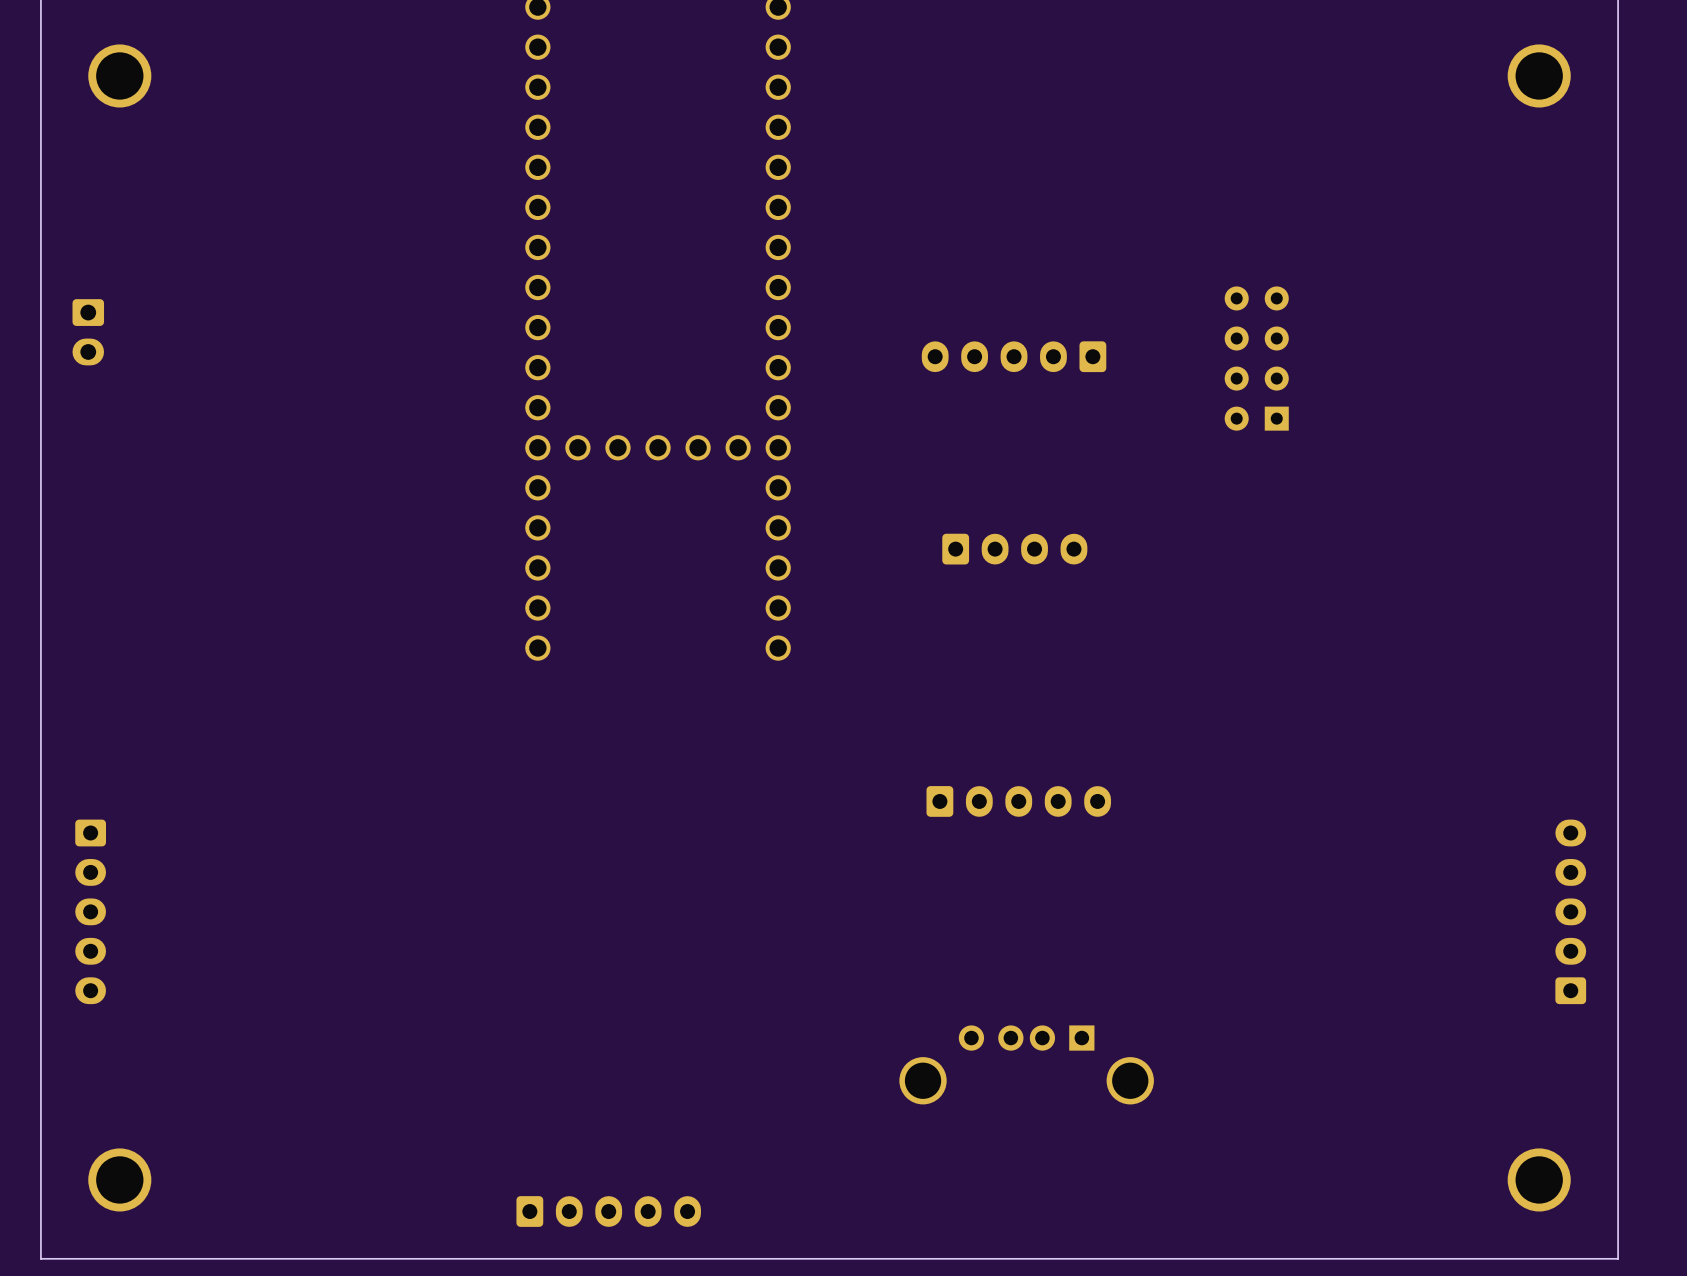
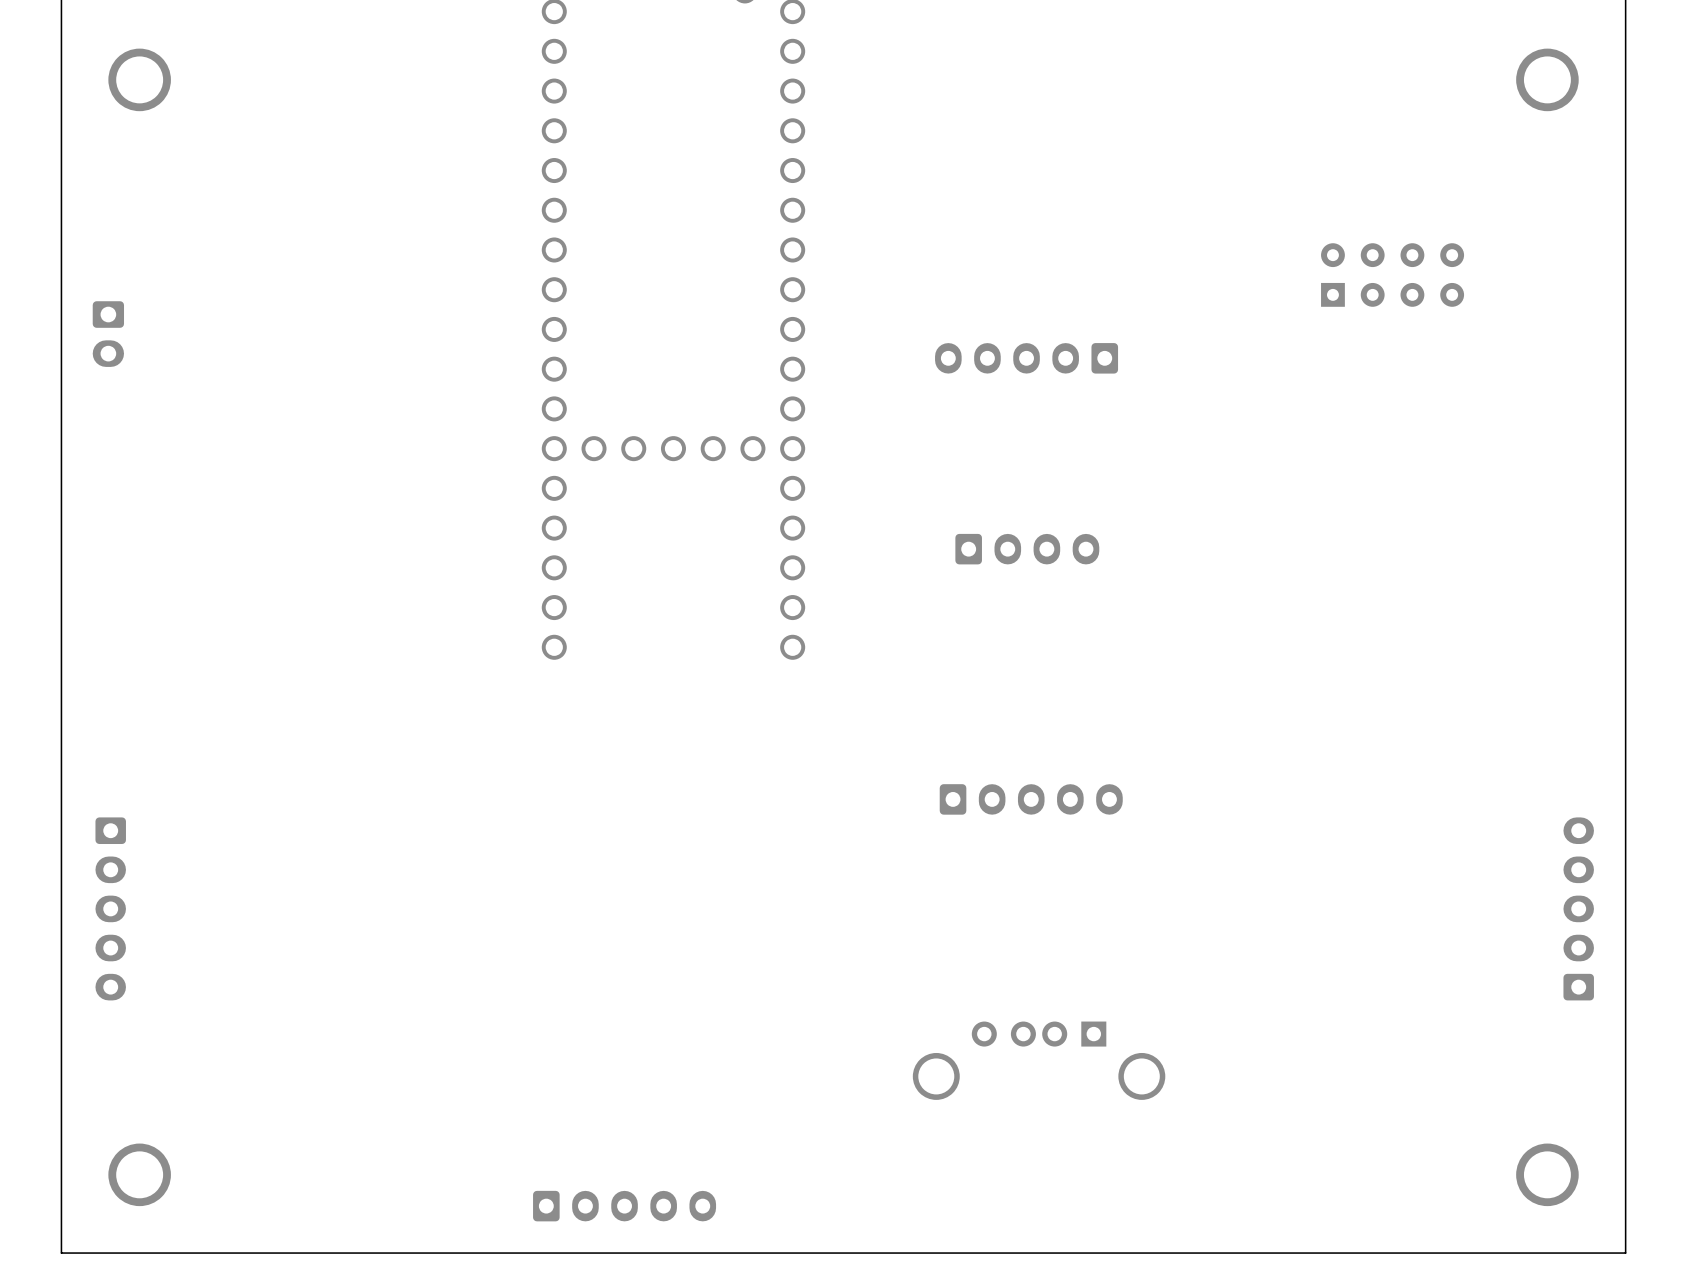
part rotation: 0° (1256, 358) -> 90° clockwise (1392, 275)
part position: (1256, 358) -> (1392, 275)

